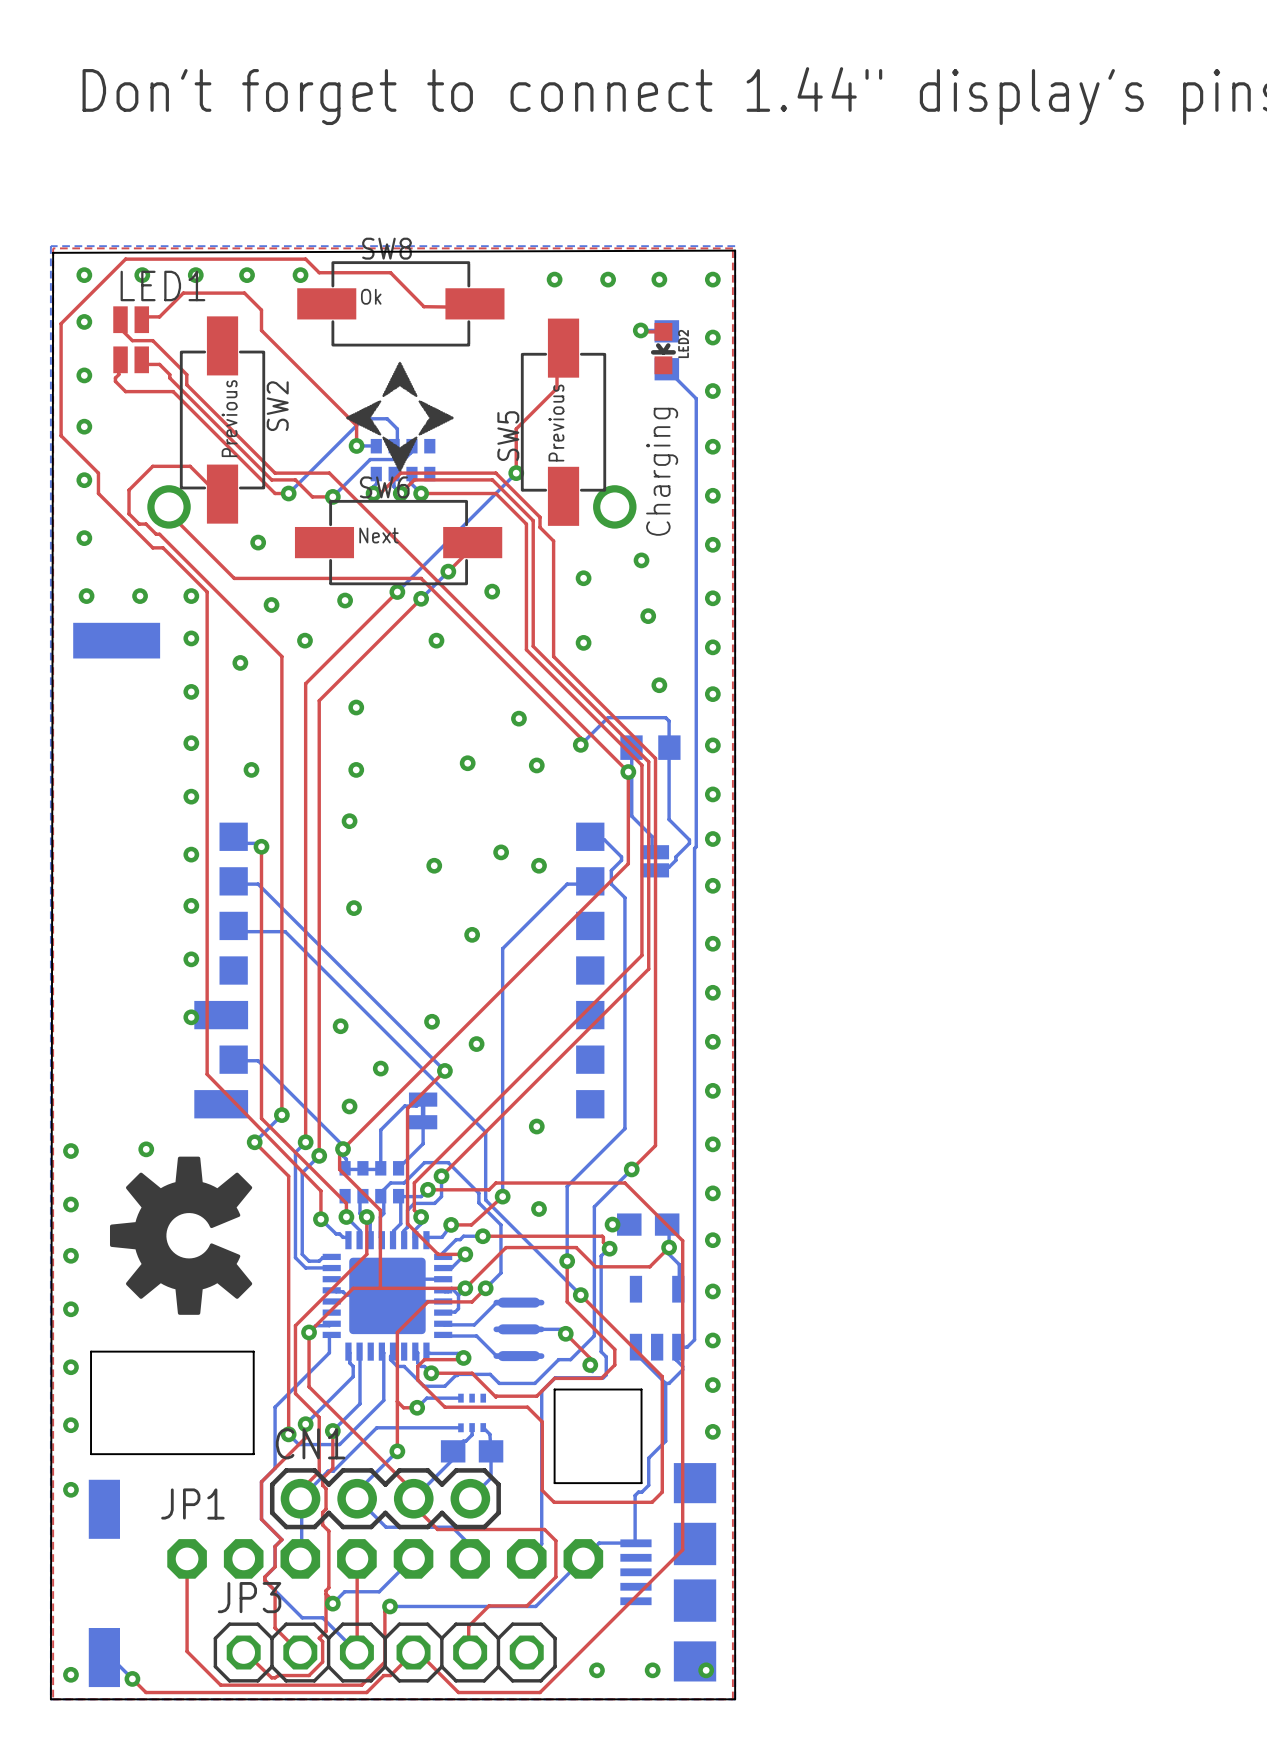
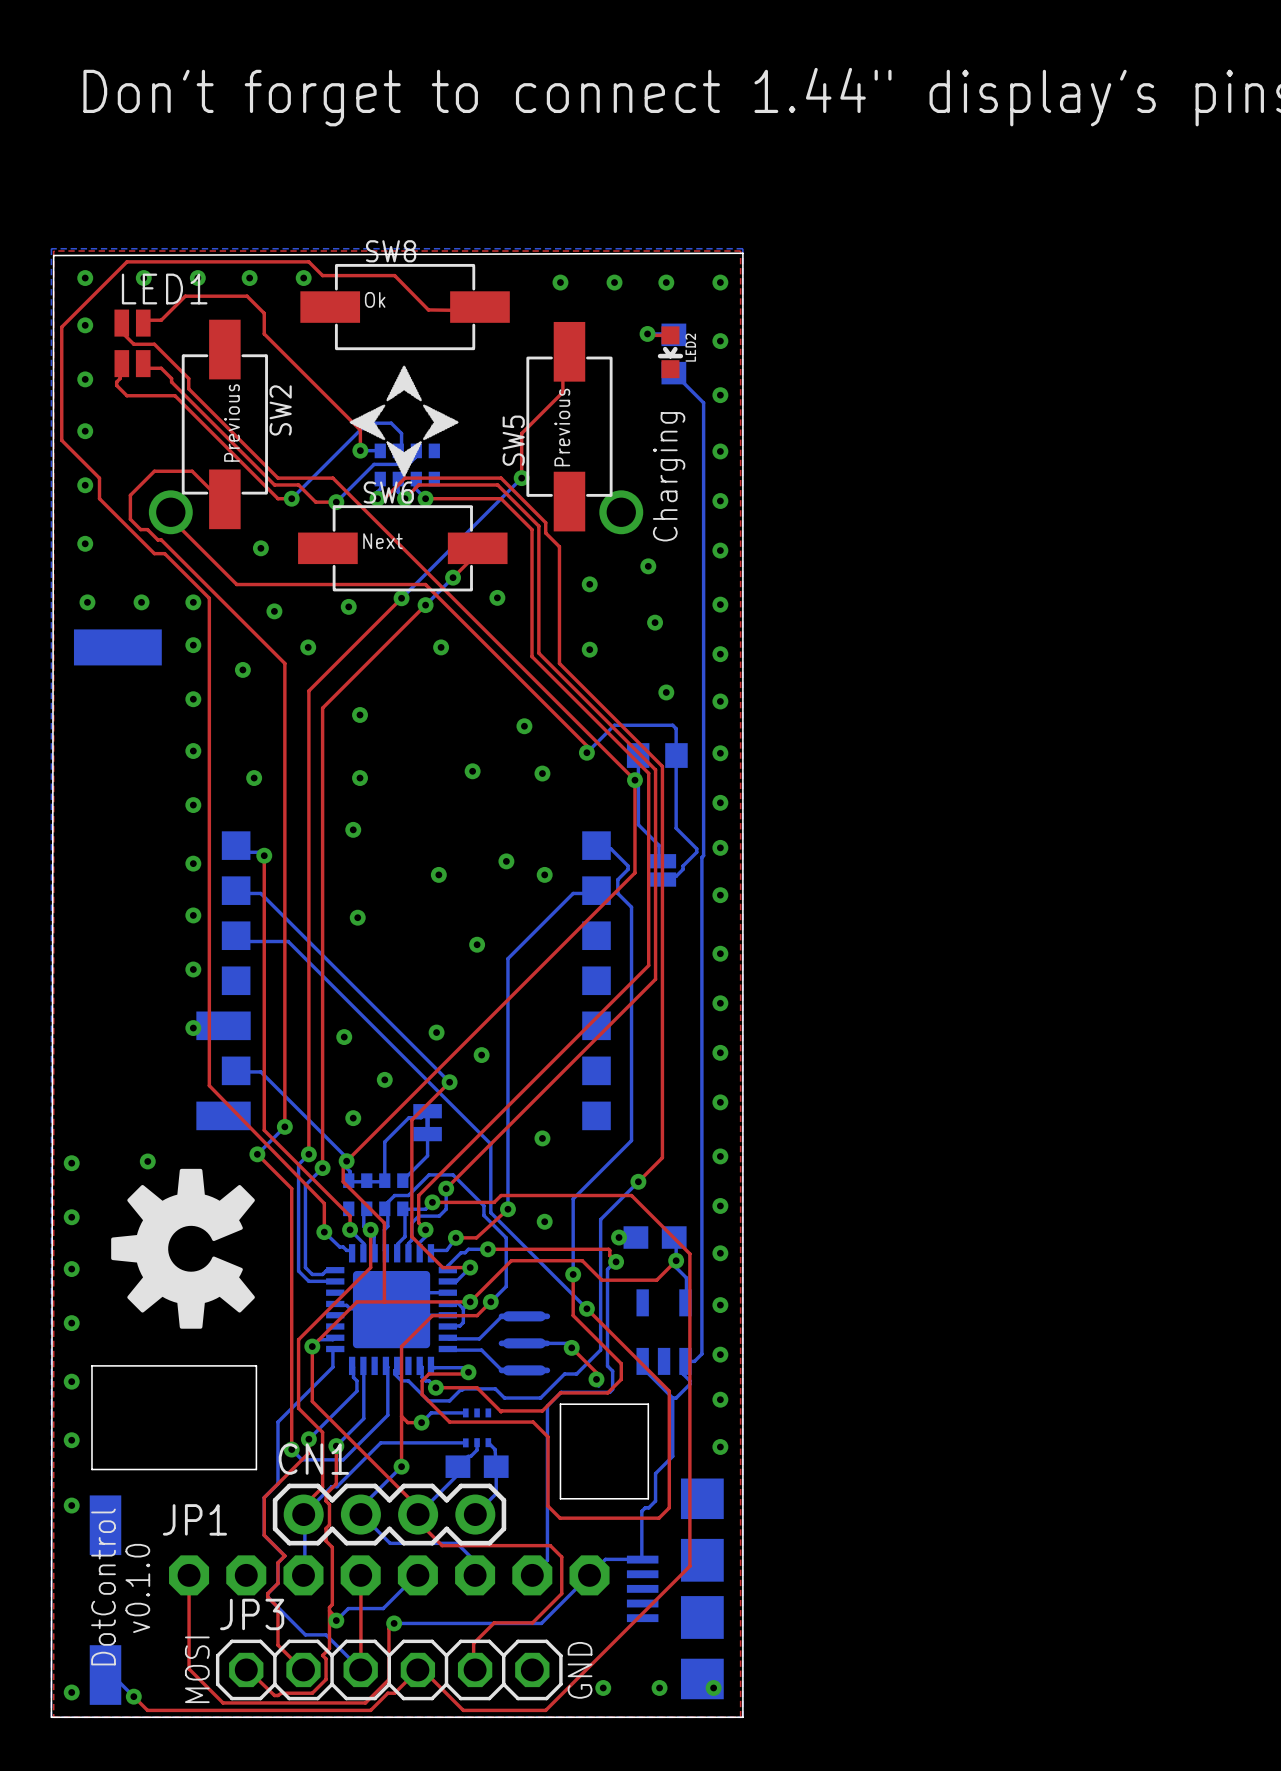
text: none -> DotControl (103, 1586)
text: none -> v0.1.0 (137, 1588)
text: none -> MOSI (197, 1669)
text: none -> GND (580, 1670)

